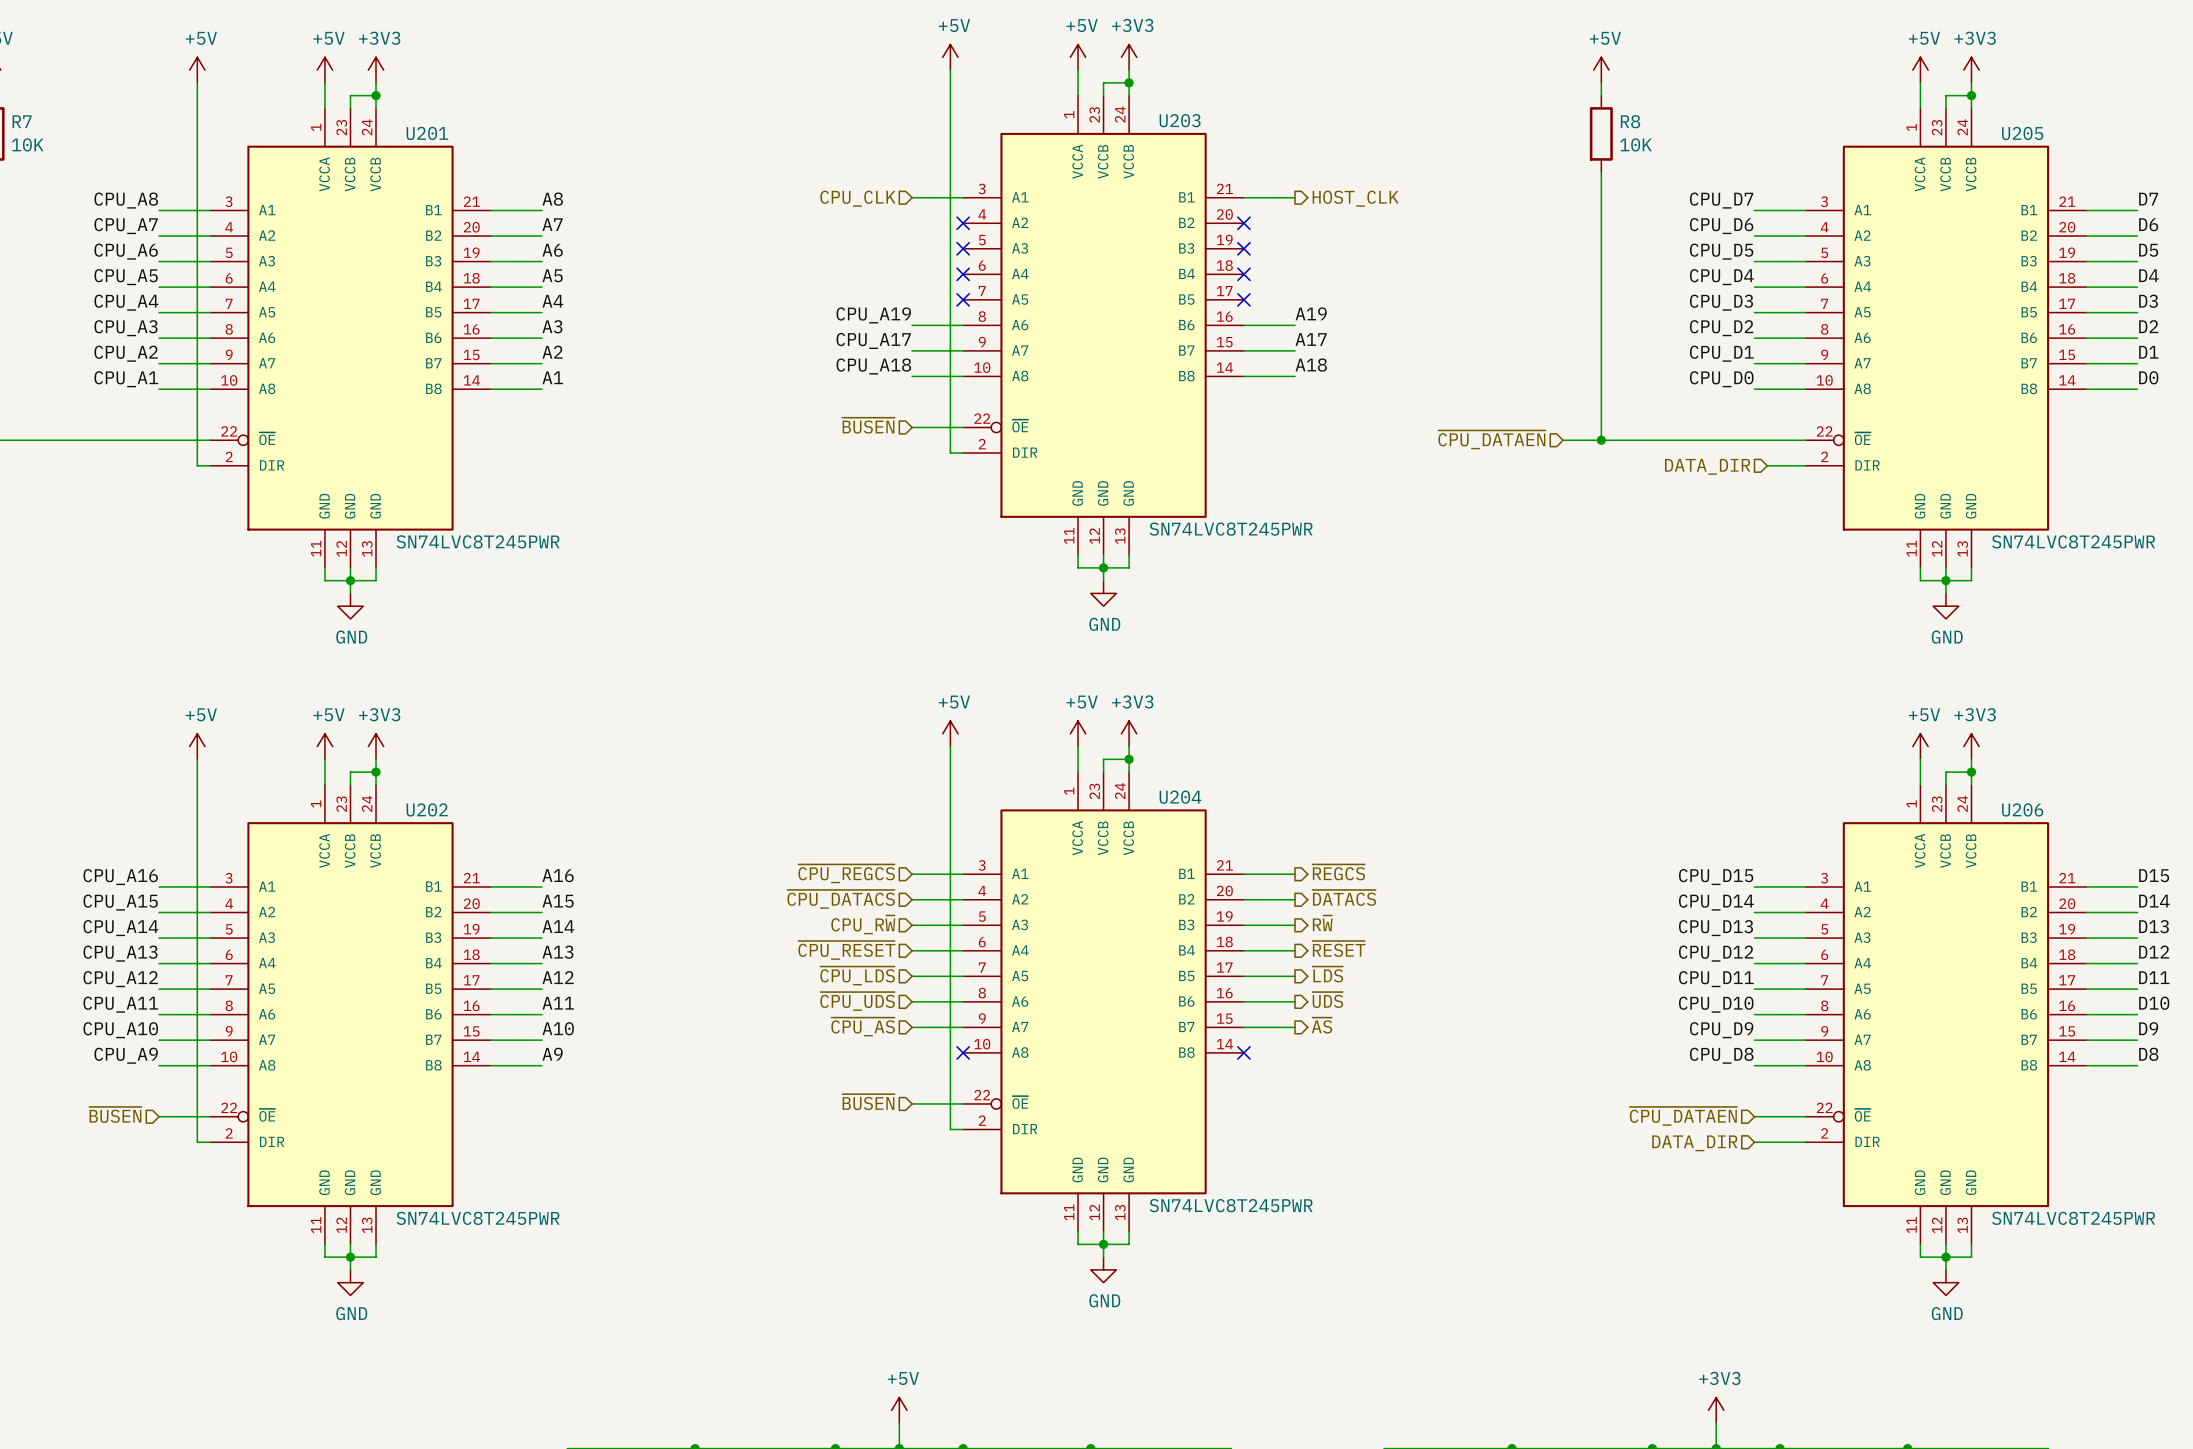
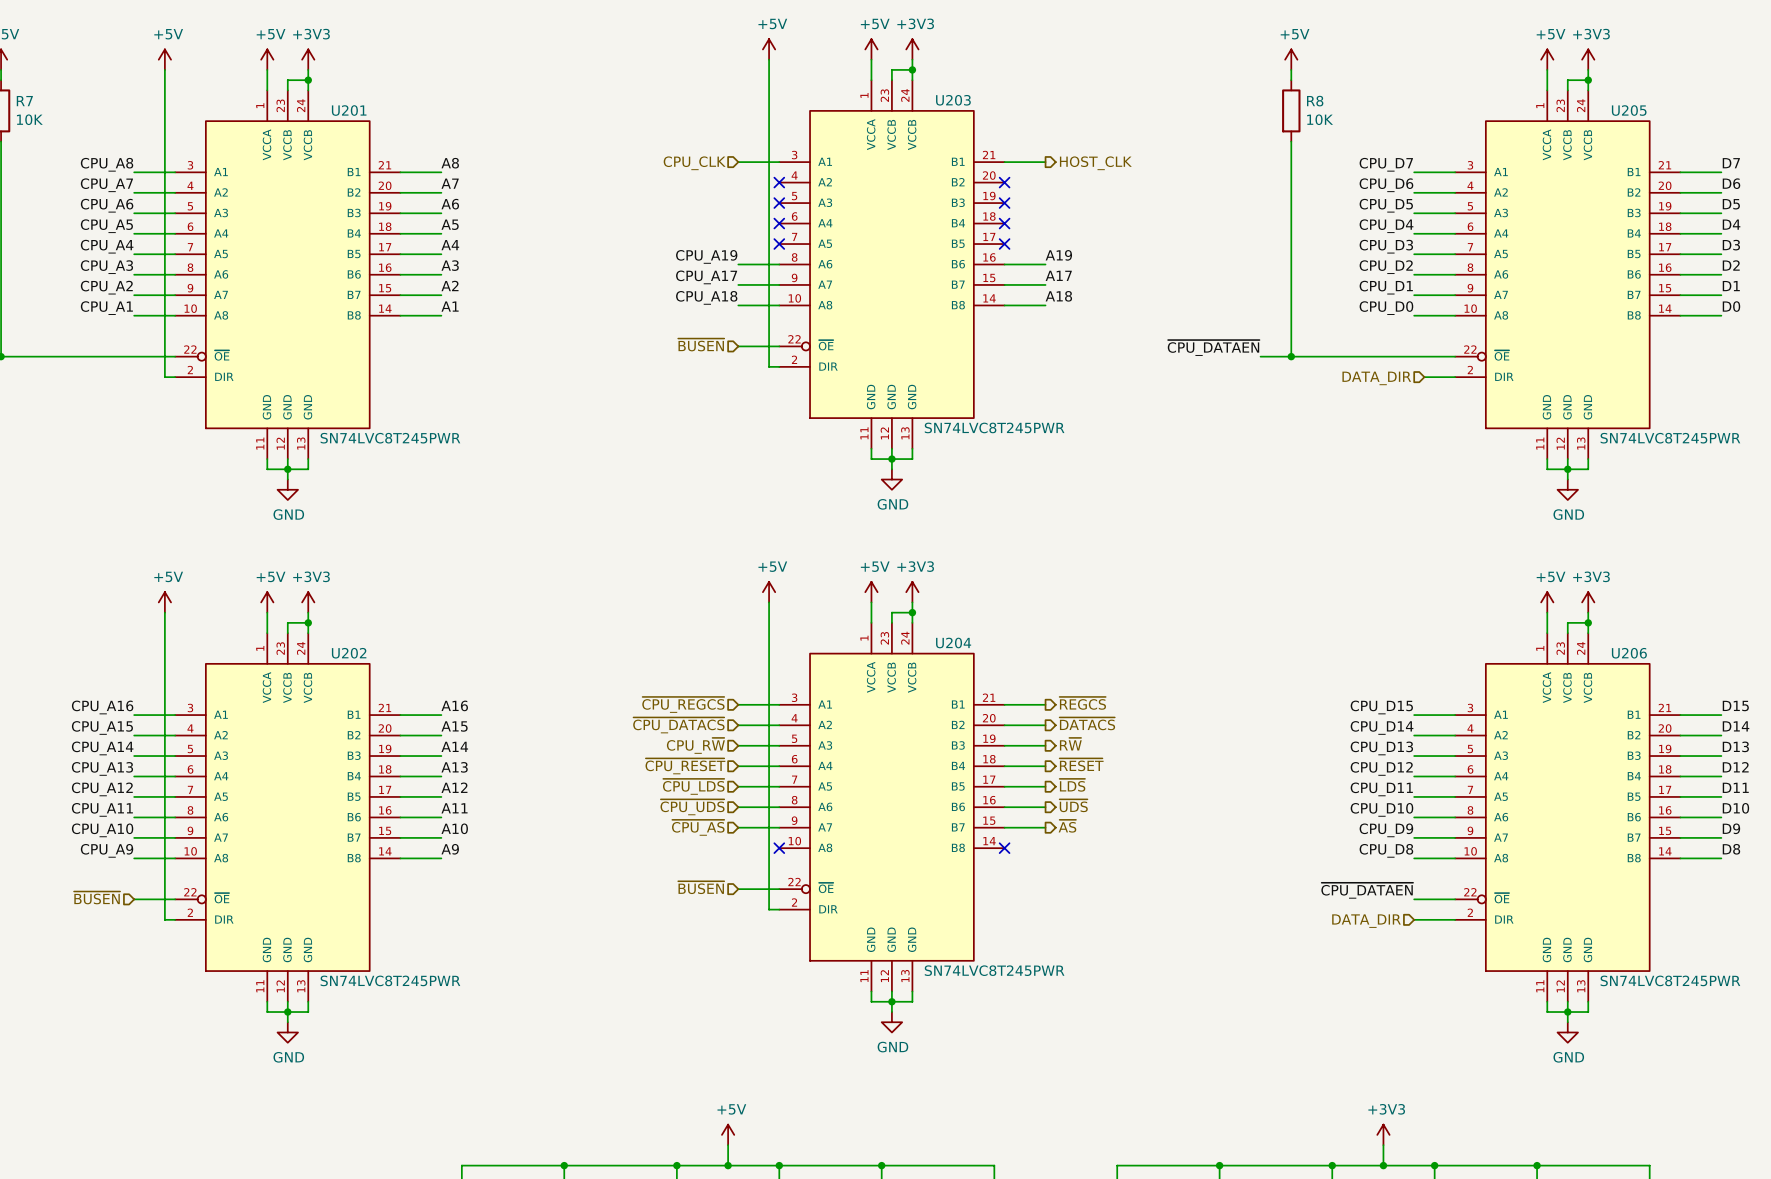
label: none -> ~{CPU_DATAEN} (1213, 347)
hierarchical label: ~{CPU_DATAEN} (1491, 439) -> none
label: none -> ~{CPU_DATAEN} (1367, 890)
hierarchical label: ~{CPU_DATAEN} (1683, 1116) -> none

